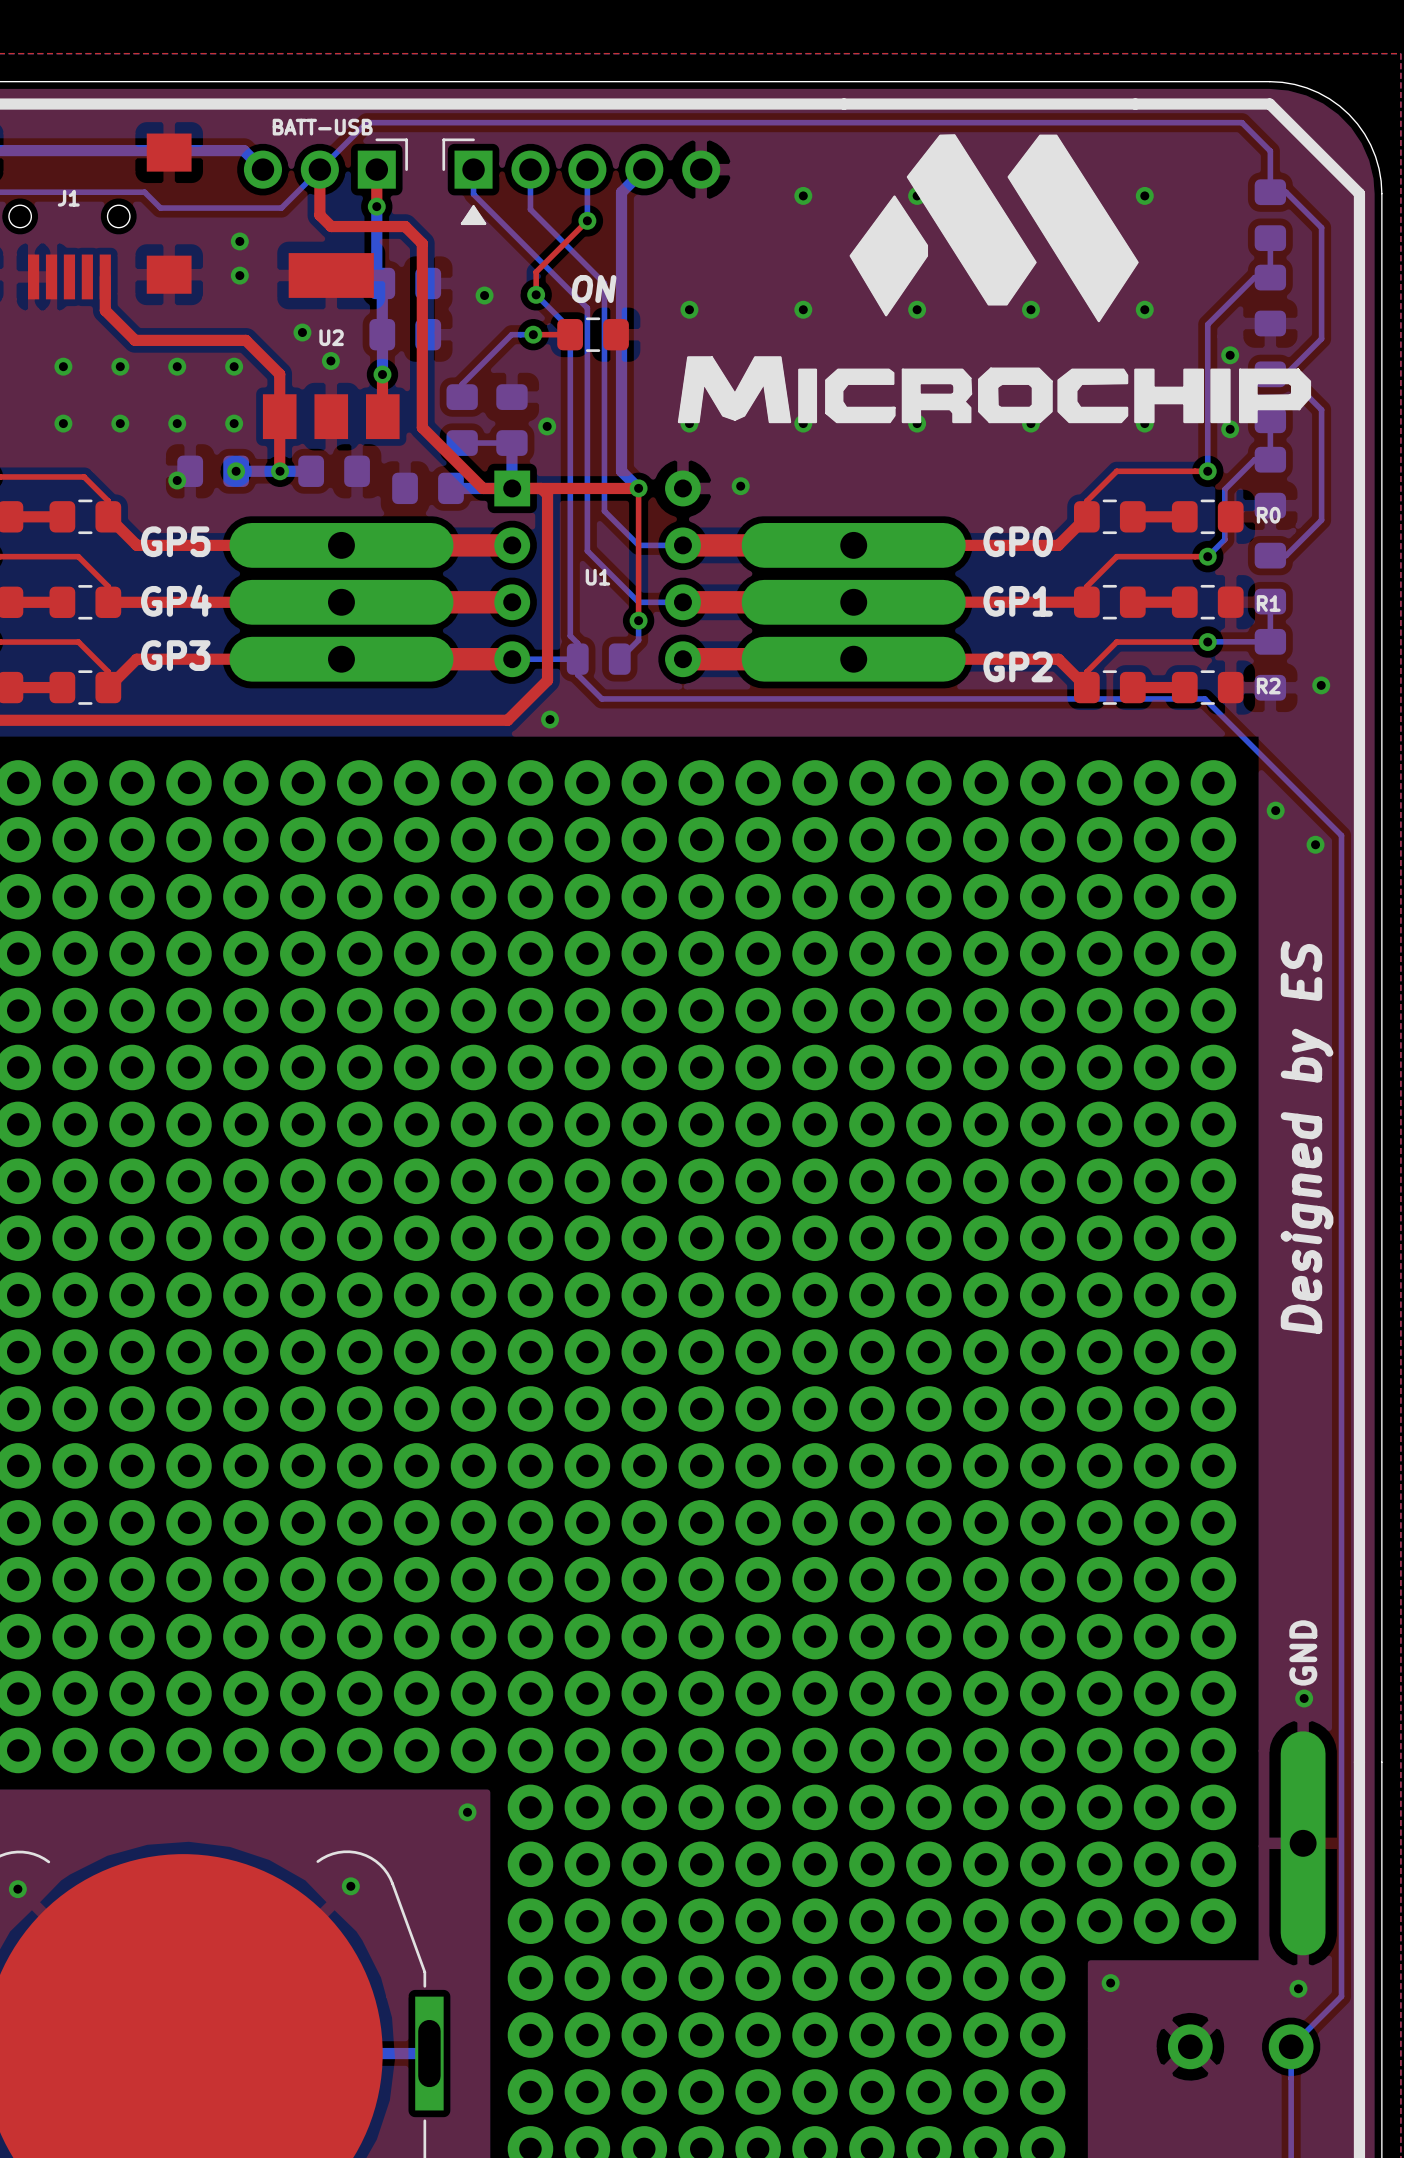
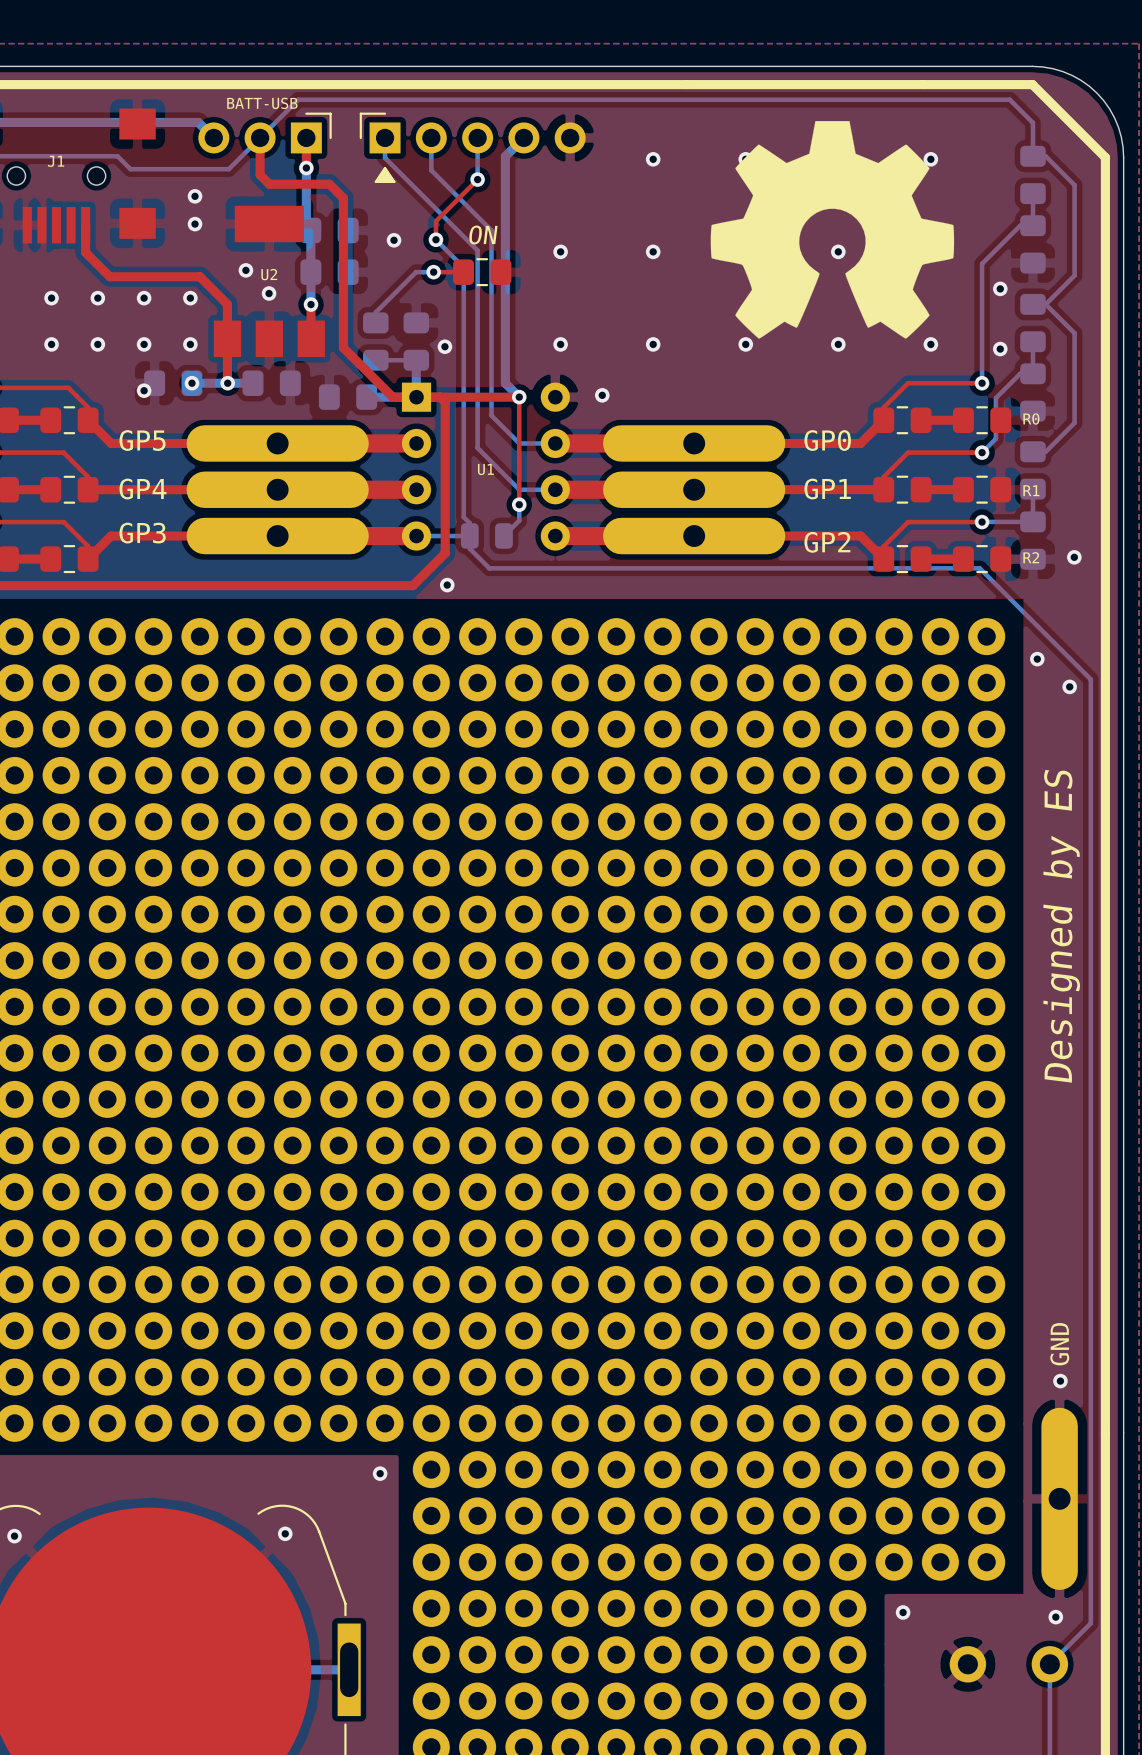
drawing: [849, 134, 1139, 323] -> none
drawing: none -> [710, 121, 955, 339]
drawing: [677, 356, 1312, 424] -> none

